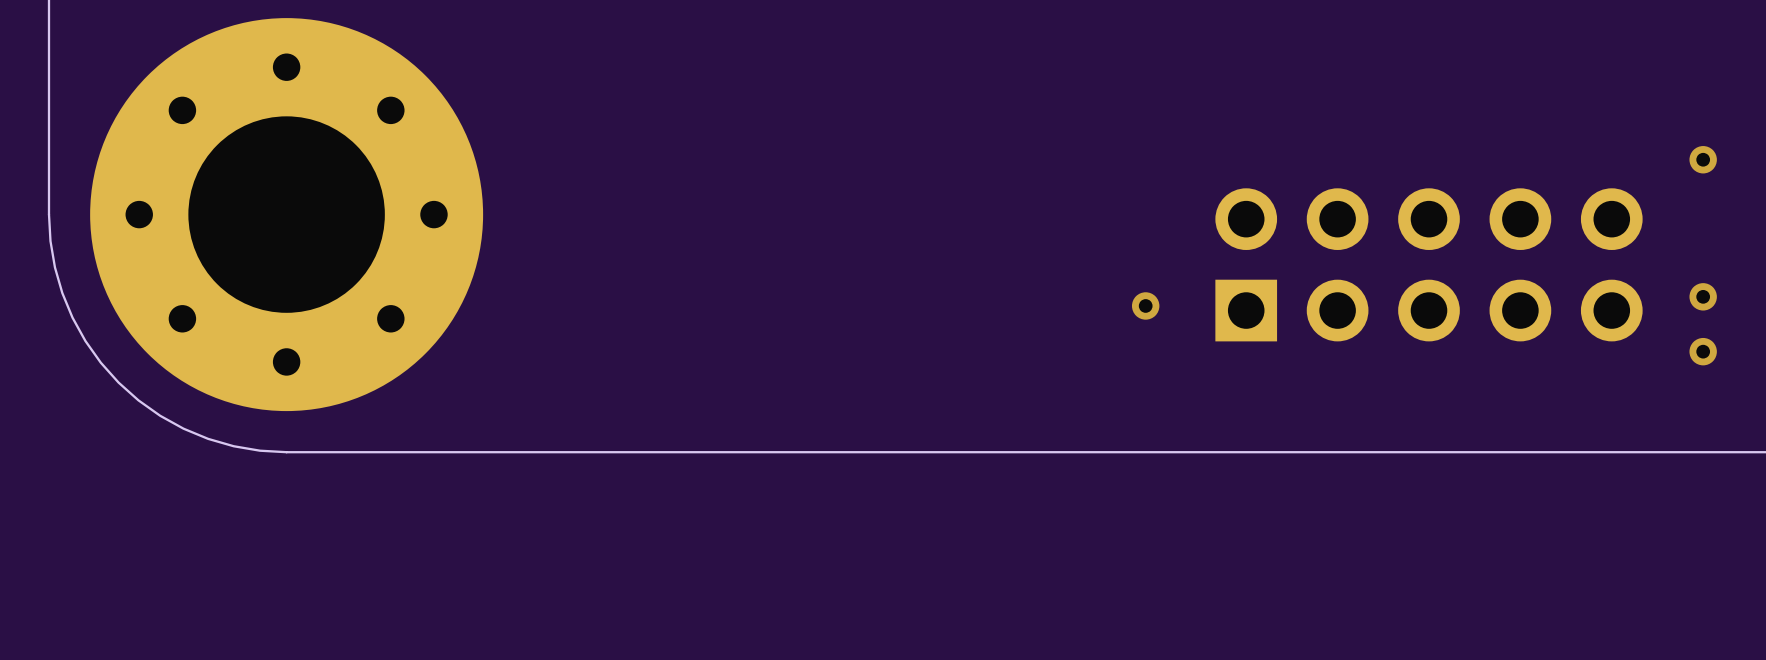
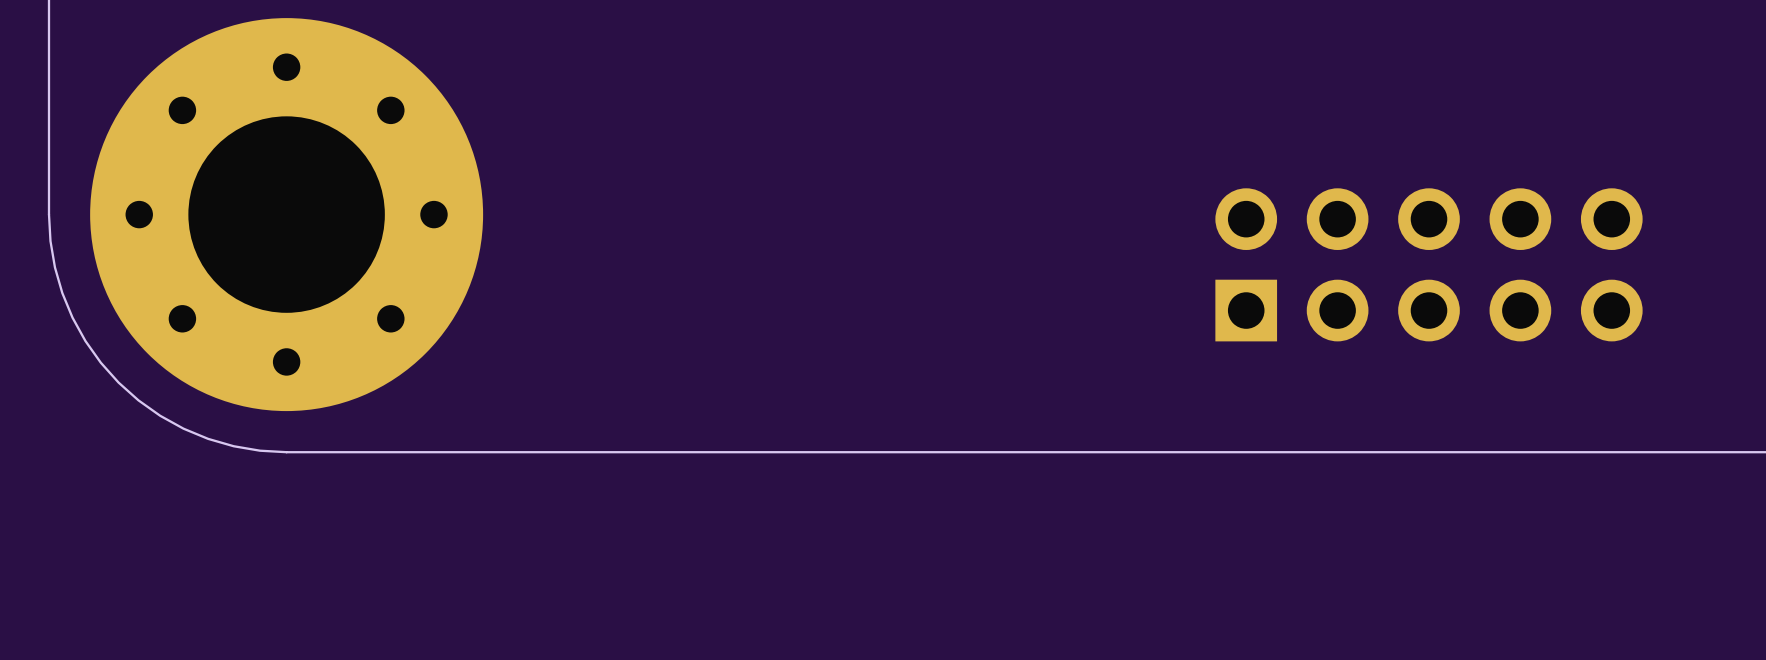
via: (1703, 159) -> none
via: (1703, 296) -> none
via: (1145, 305) -> none
via: (1703, 351) -> none

